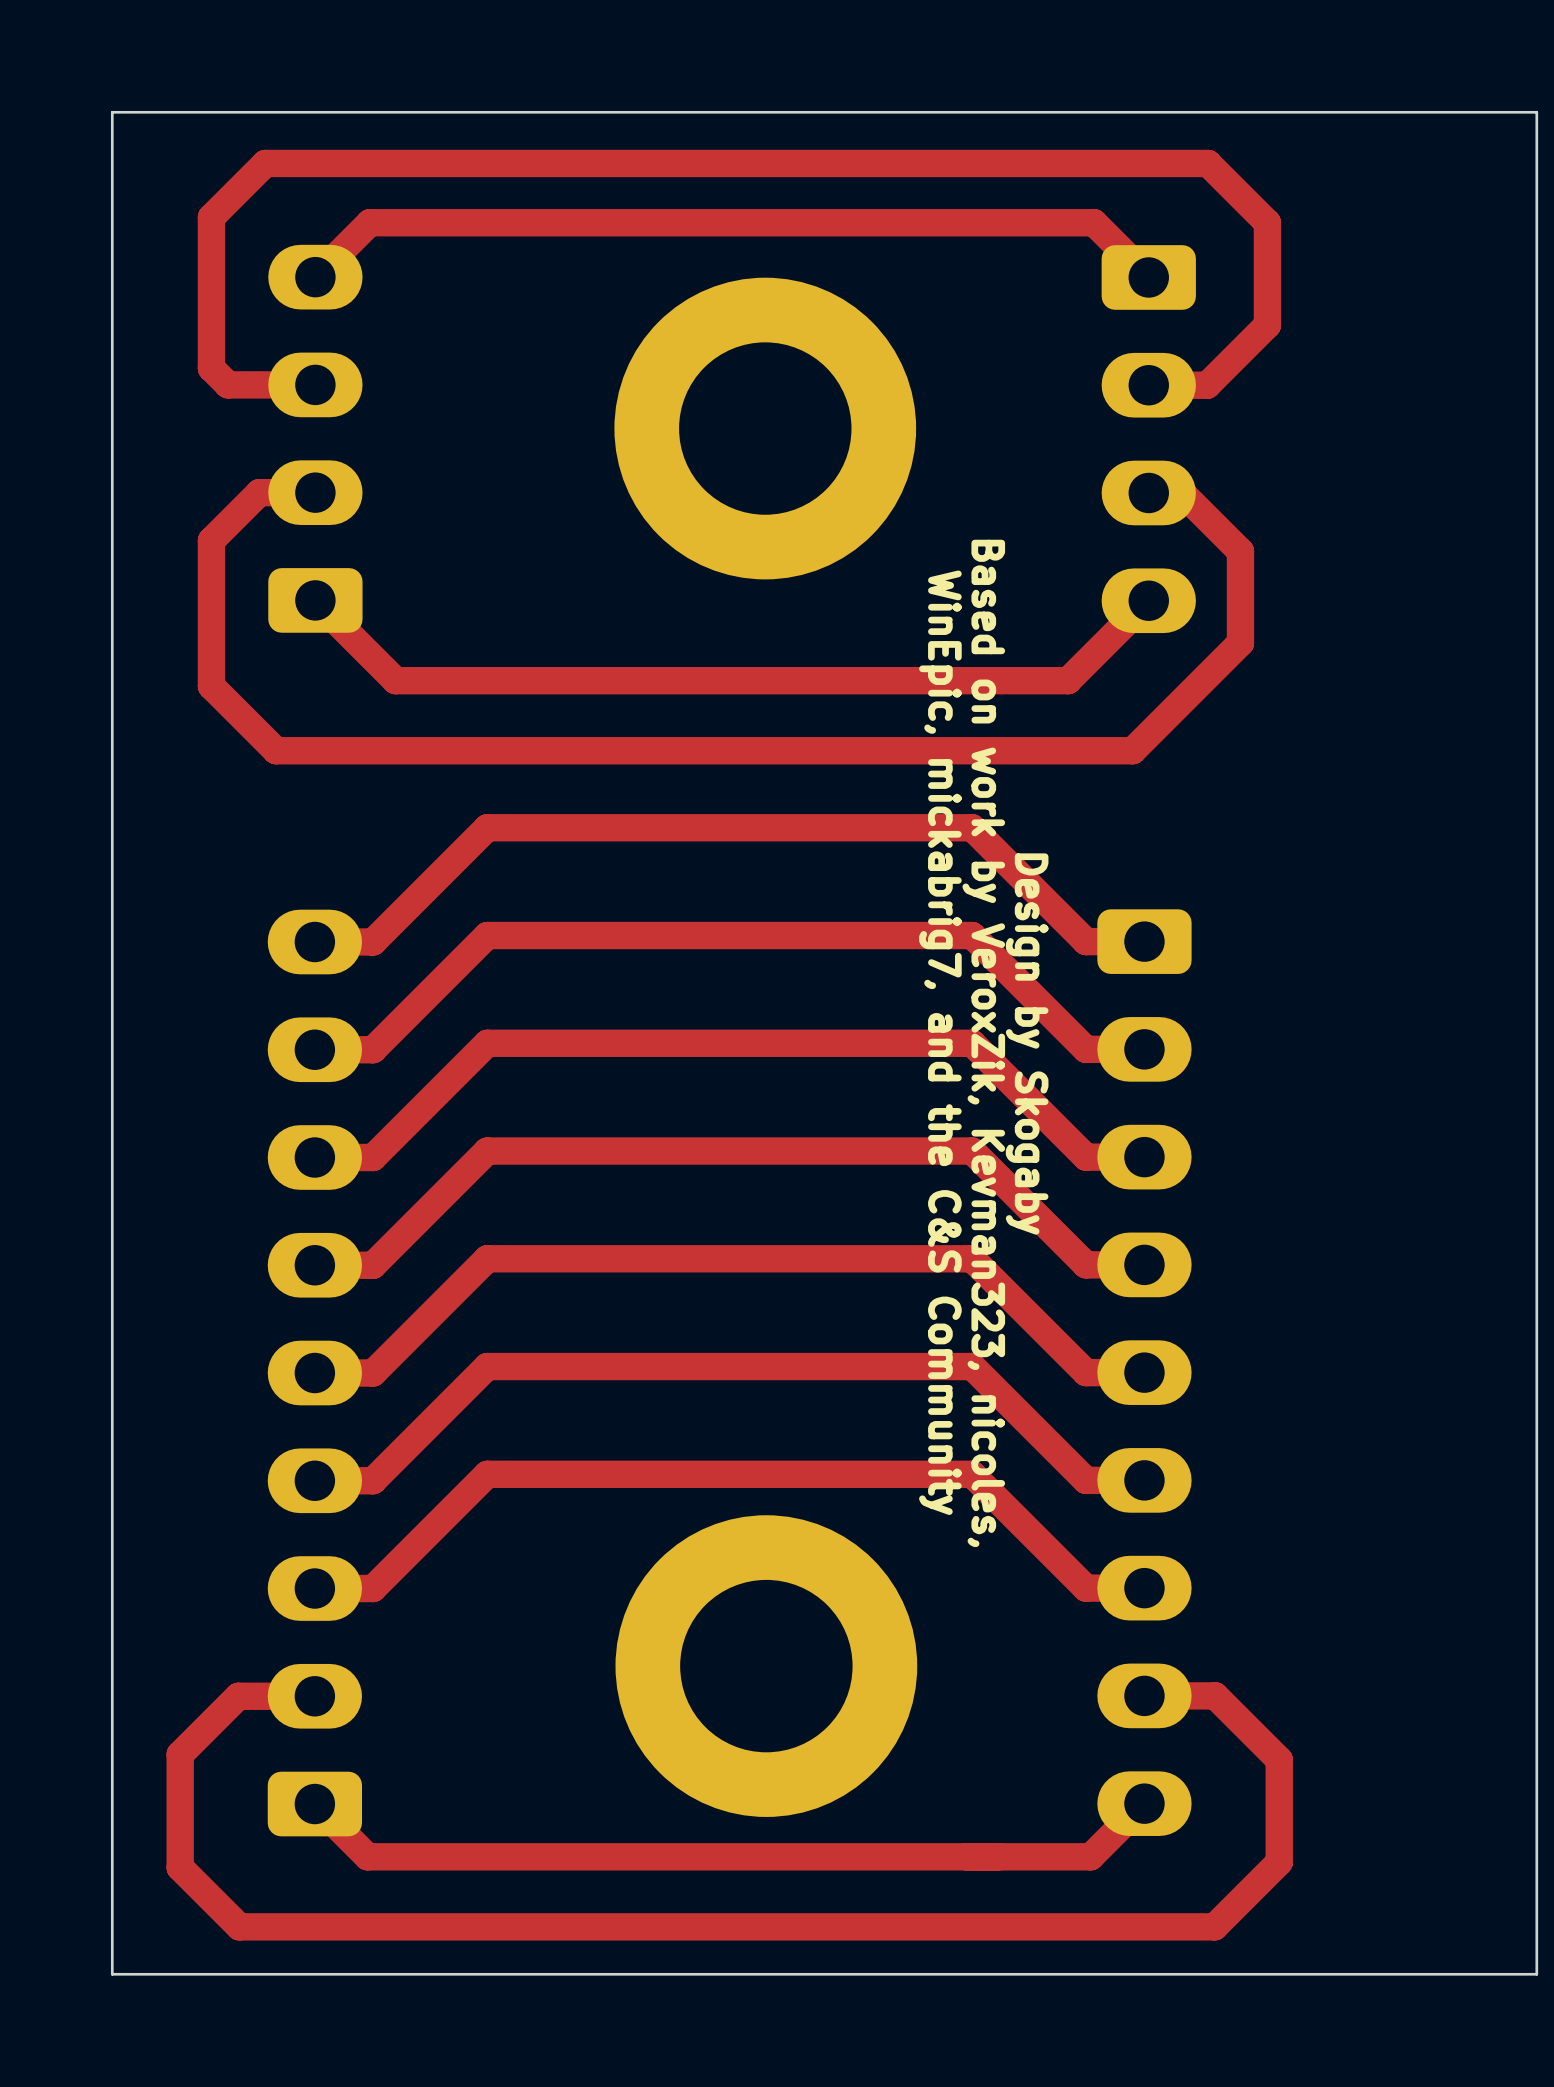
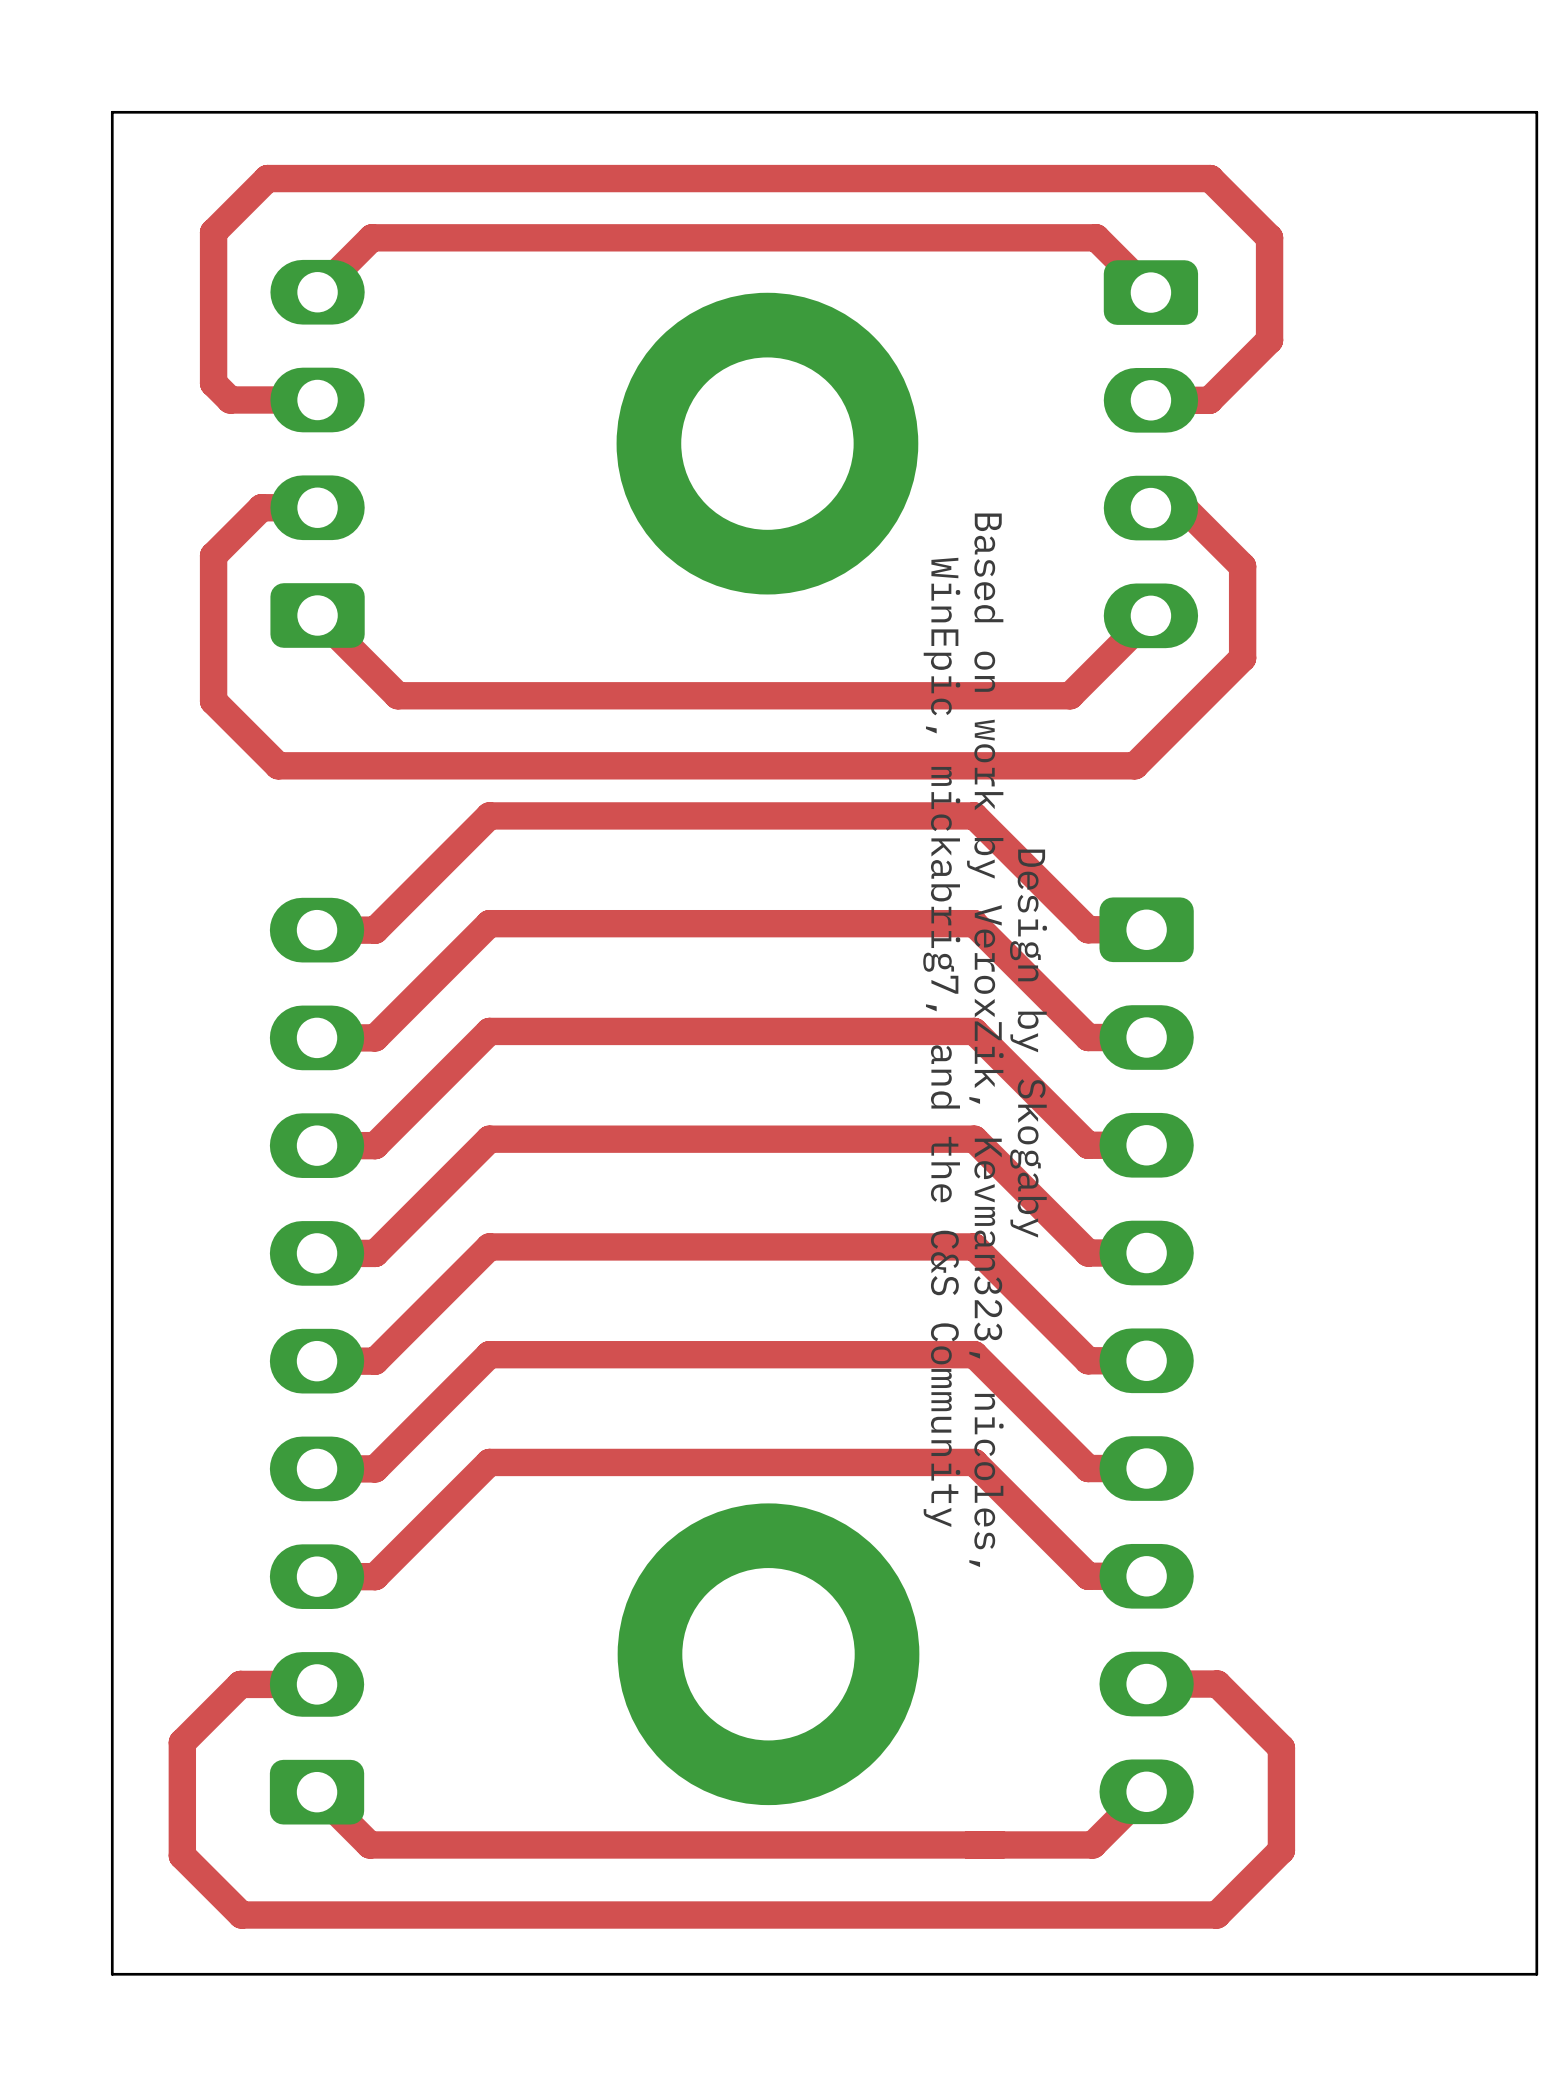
top track: (315, 277) (369, 222) (1094, 222) (1148, 277) -> (317, 292) (371, 237) (1096, 237) (1150, 292)
top track: (315, 384) (228, 384) (211, 368) (211, 217) (265, 163) (1208, 163) (1267, 222) (1267, 325) (1207, 385) (1148, 385) -> (317, 399) (230, 399) (213, 383) (213, 232) (267, 178) (1210, 178) (1269, 237) (1269, 340) (1209, 400) (1150, 400)
part position: (765, 428) -> (767, 443)
part position: (315, 438) -> (317, 453)
part position: (1148, 439) -> (1150, 454)
top track: (315, 492) (259, 492) (211, 540) (211, 686) (276, 750) (1132, 750) (1240, 642) (1240, 551) (1182, 492) (1148, 492) -> (317, 507) (261, 507) (213, 555) (213, 701) (278, 765) (1134, 765) (1242, 658) (1242, 566) (1184, 508) (1150, 508)
top track: (315, 600) (395, 680) (1068, 680) (1148, 600) -> (317, 615) (397, 695) (1070, 695) (1150, 615)
top track: (1144, 941) (1086, 941) (972, 827) (487, 827) (373, 941) (314, 941) -> (1146, 929) (1088, 929) (974, 815) (489, 815) (375, 930) (317, 930)
top track: (1144, 1049) (1086, 1049) (972, 935) (487, 935) (373, 1049) (314, 1049) -> (1146, 1037) (1088, 1037) (974, 923) (489, 923) (375, 1037) (317, 1037)
top track: (1144, 1157) (1086, 1157) (972, 1043) (487, 1043) (373, 1157) (314, 1157) -> (1146, 1145) (1088, 1145) (974, 1031) (489, 1031) (375, 1145) (317, 1145)
top track: (1144, 1264) (1086, 1264) (972, 1151) (487, 1151) (373, 1265) (314, 1265) -> (1146, 1253) (1088, 1253) (974, 1139) (489, 1139) (375, 1253) (317, 1253)
top track: (1144, 1372) (1086, 1372) (972, 1258) (487, 1258) (373, 1373) (314, 1373) -> (1146, 1360) (1088, 1360) (974, 1246) (489, 1246) (375, 1361) (317, 1361)
part position: (1144, 1372) -> (1146, 1360)
part position: (314, 1373) -> (317, 1361)
top track: (1144, 1480) (1086, 1480) (972, 1366) (487, 1366) (373, 1480) (314, 1480) -> (1146, 1468) (1088, 1468) (974, 1354) (489, 1354) (375, 1468) (317, 1468)
top track: (1144, 1588) (1086, 1588) (972, 1474) (487, 1474) (373, 1588) (314, 1588) -> (1146, 1576) (1088, 1576) (974, 1462) (489, 1462) (375, 1576) (317, 1576)
part position: (766, 1666) -> (768, 1654)
top track: (1144, 1695) (1215, 1695) (1279, 1759) (1279, 1862) (1214, 1926) (239, 1926) (180, 1867) (180, 1754) (238, 1696) (314, 1696) -> (1146, 1684) (1217, 1684) (1281, 1747) (1281, 1850) (1216, 1915) (241, 1915) (182, 1855) (182, 1742) (240, 1684) (317, 1684)
top track: (1143, 1803) (1090, 1856) (367, 1856) (314, 1804) -> (1146, 1791) (1092, 1844) (369, 1844) (317, 1792)

